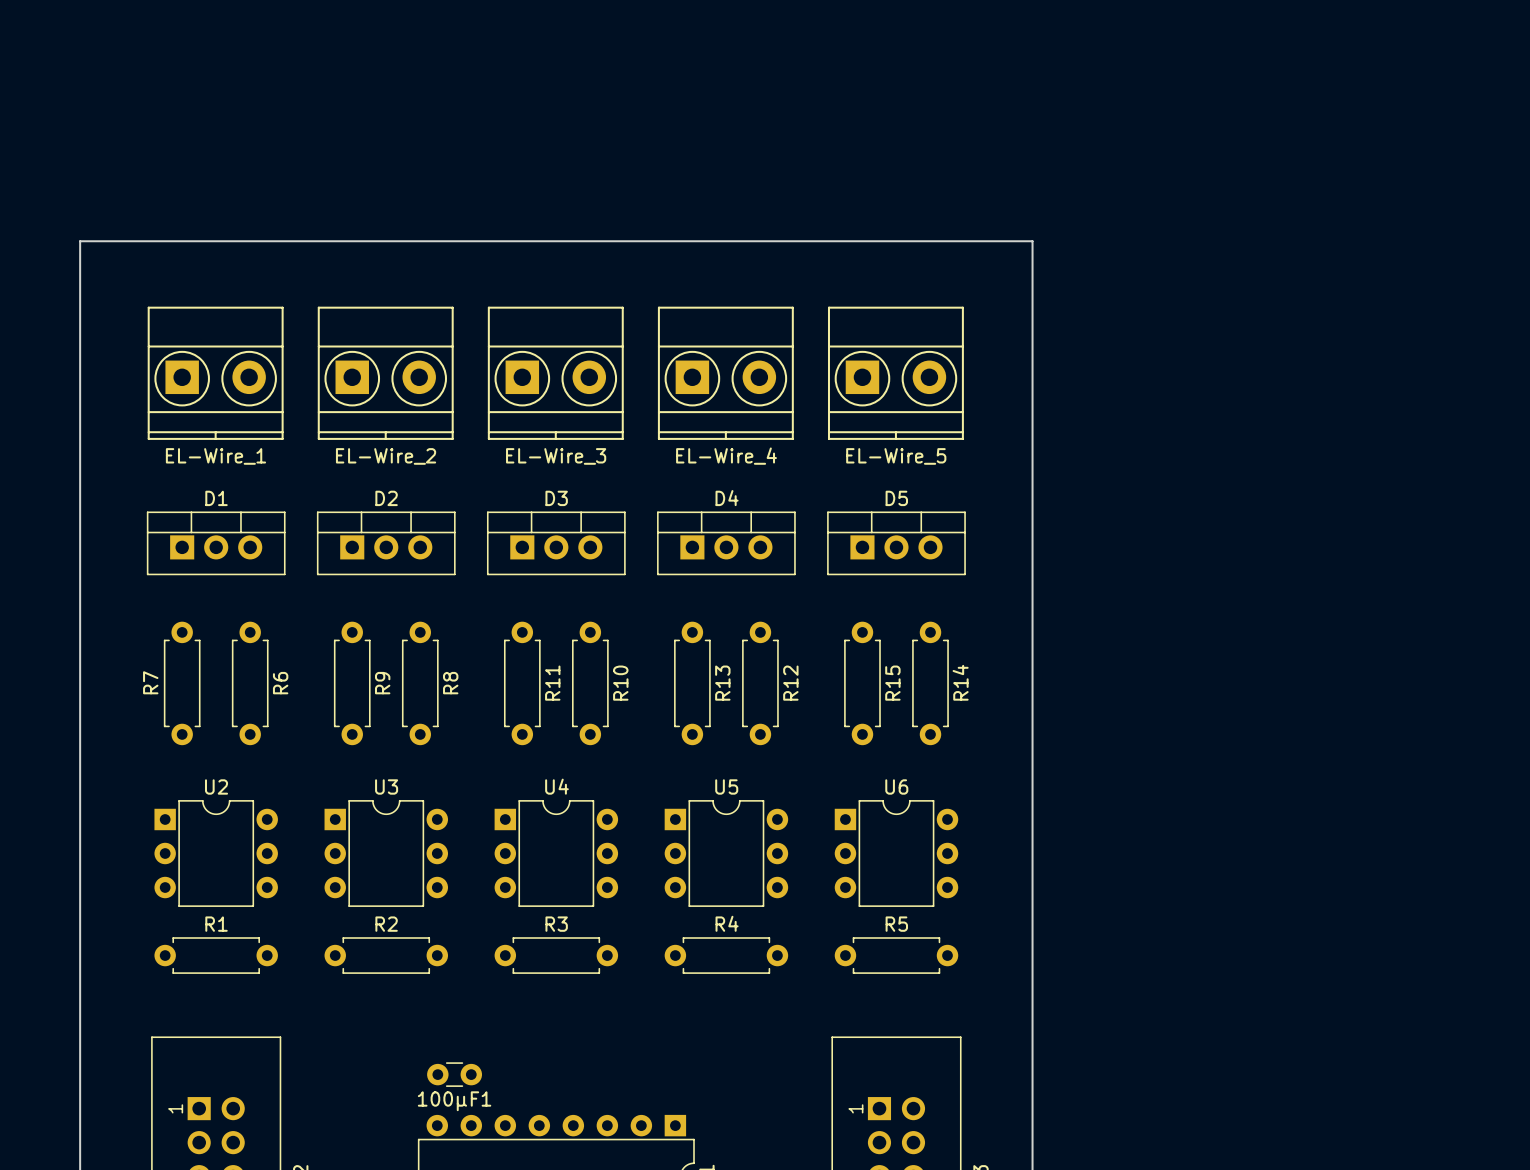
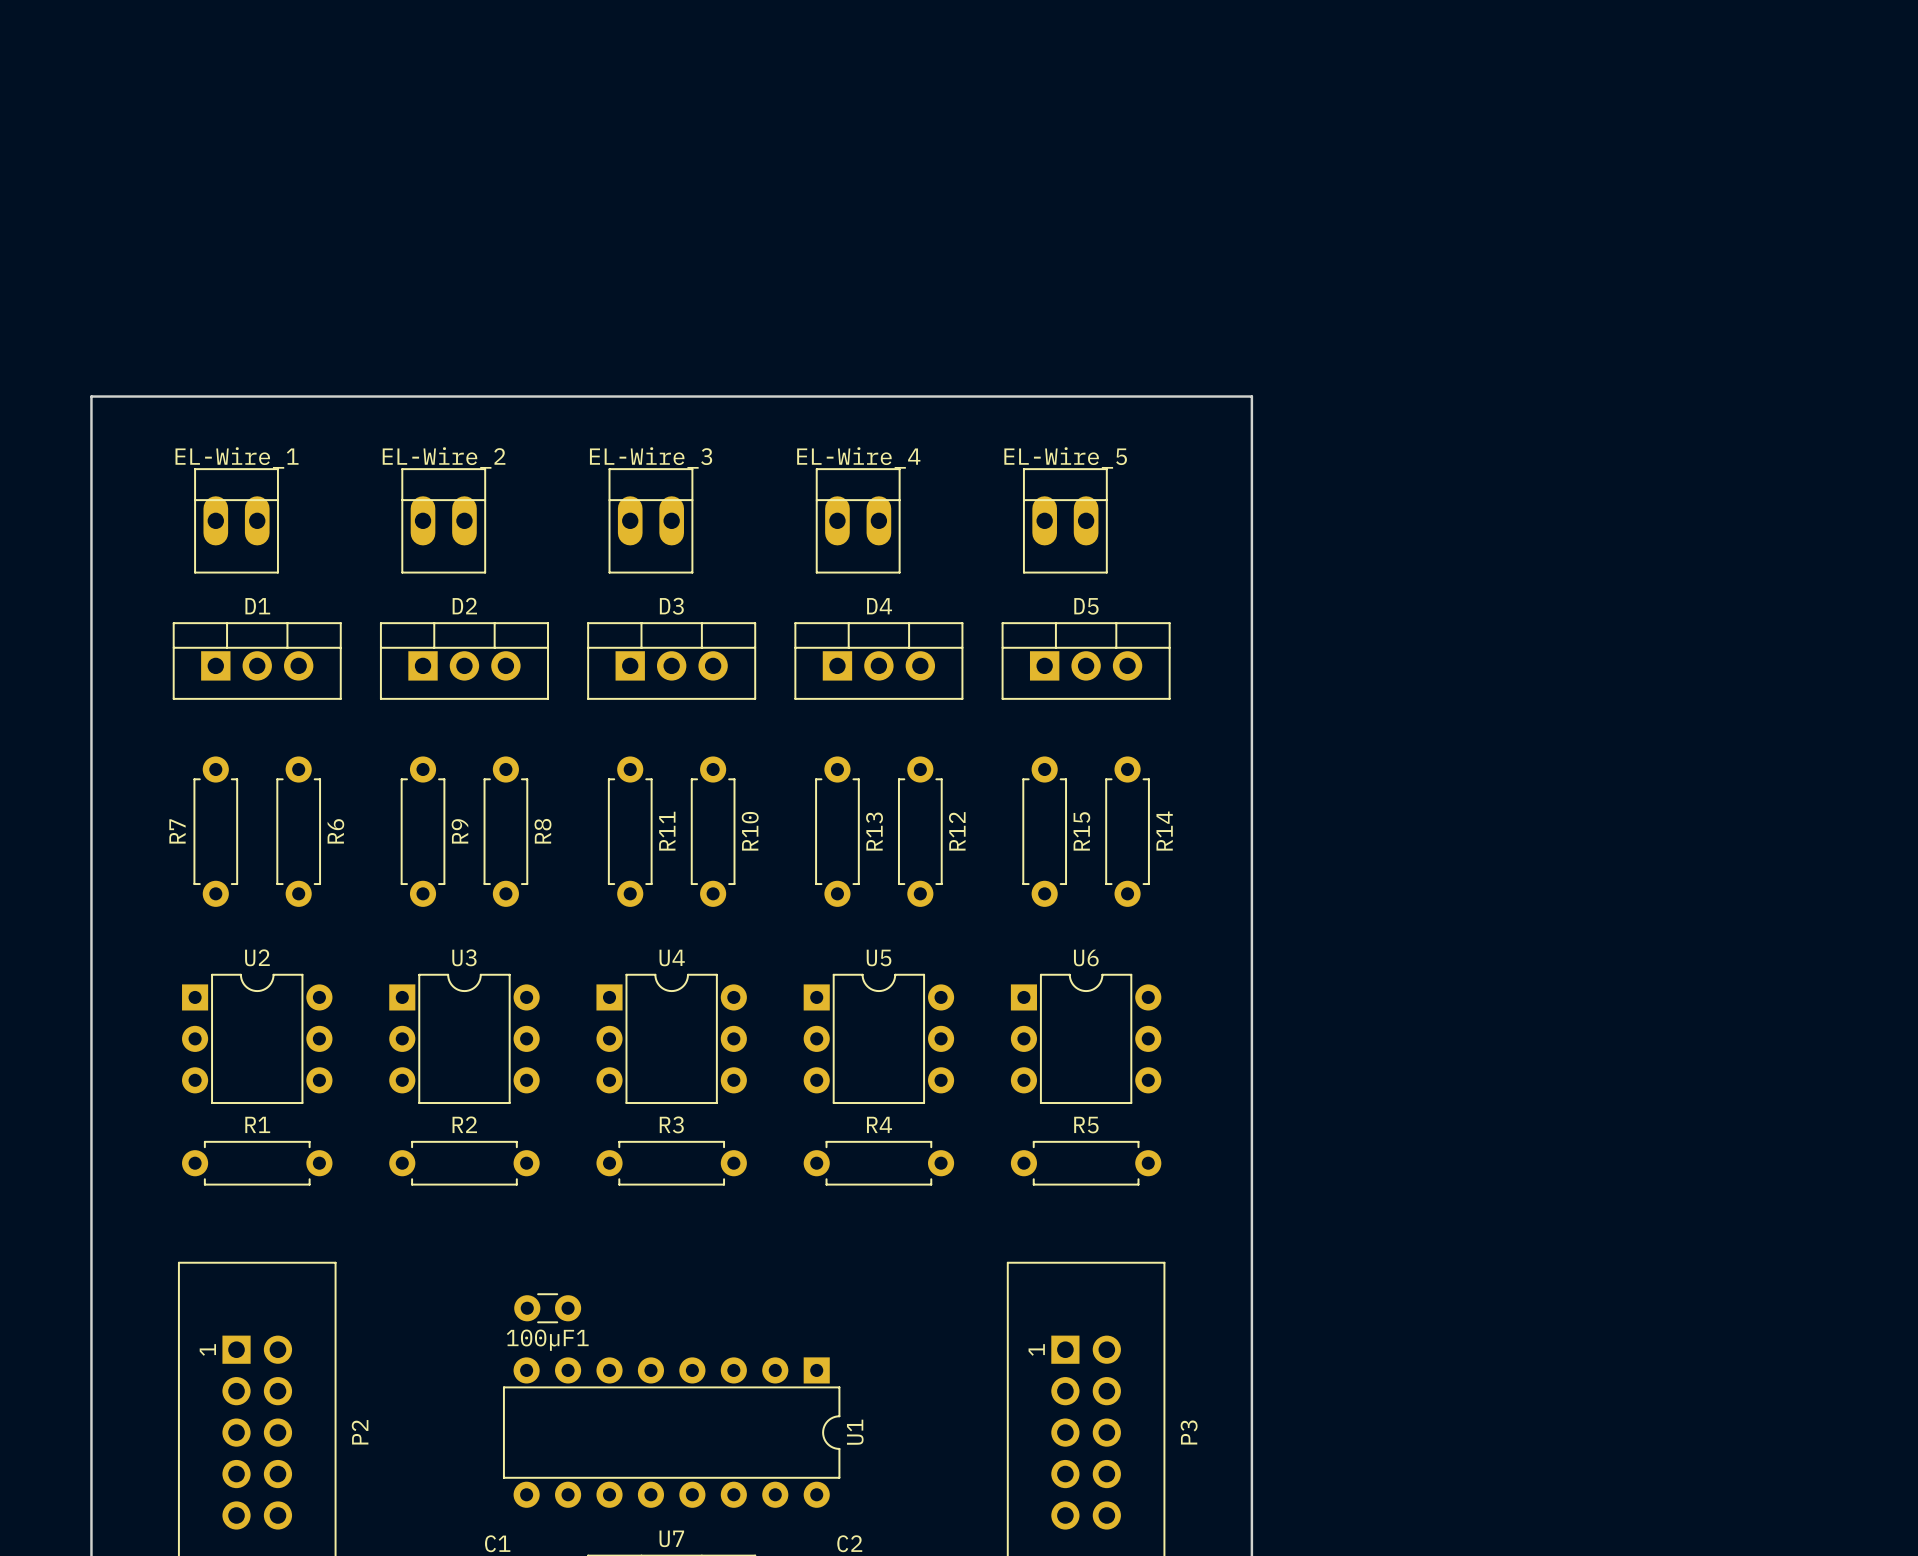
EL-Wire_1 footprint: [147, 306, 284, 440] -> [194, 468, 279, 574]
EL-Wire_2 footprint: [317, 306, 454, 440] -> [401, 468, 487, 574]
EL-Wire_3 footprint: [487, 306, 624, 440] -> [608, 468, 694, 574]
EL-Wire_4 footprint: [657, 306, 794, 440] -> [815, 468, 901, 574]
EL-Wire_5 footprint: [827, 306, 964, 440] -> [1022, 468, 1108, 574]
board edge: (80, 326) (80, 241) (1032, 241) (1032, 326) -> (91, 396) (1251, 396)
EL-Wire_1 name position: EL-Wire_1 (215, 456) -> EL-Wire_1 (237, 457)
EL-Wire_2 name position: EL-Wire_2 (386, 456) -> EL-Wire_2 (444, 457)
EL-Wire_3 name position: EL-Wire_3 (556, 456) -> EL-Wire_3 (651, 457)
EL-Wire_4 name position: EL-Wire_4 (726, 456) -> EL-Wire_4 (858, 457)
EL-Wire_5 name position: EL-Wire_5 (896, 456) -> EL-Wire_5 (1065, 457)

